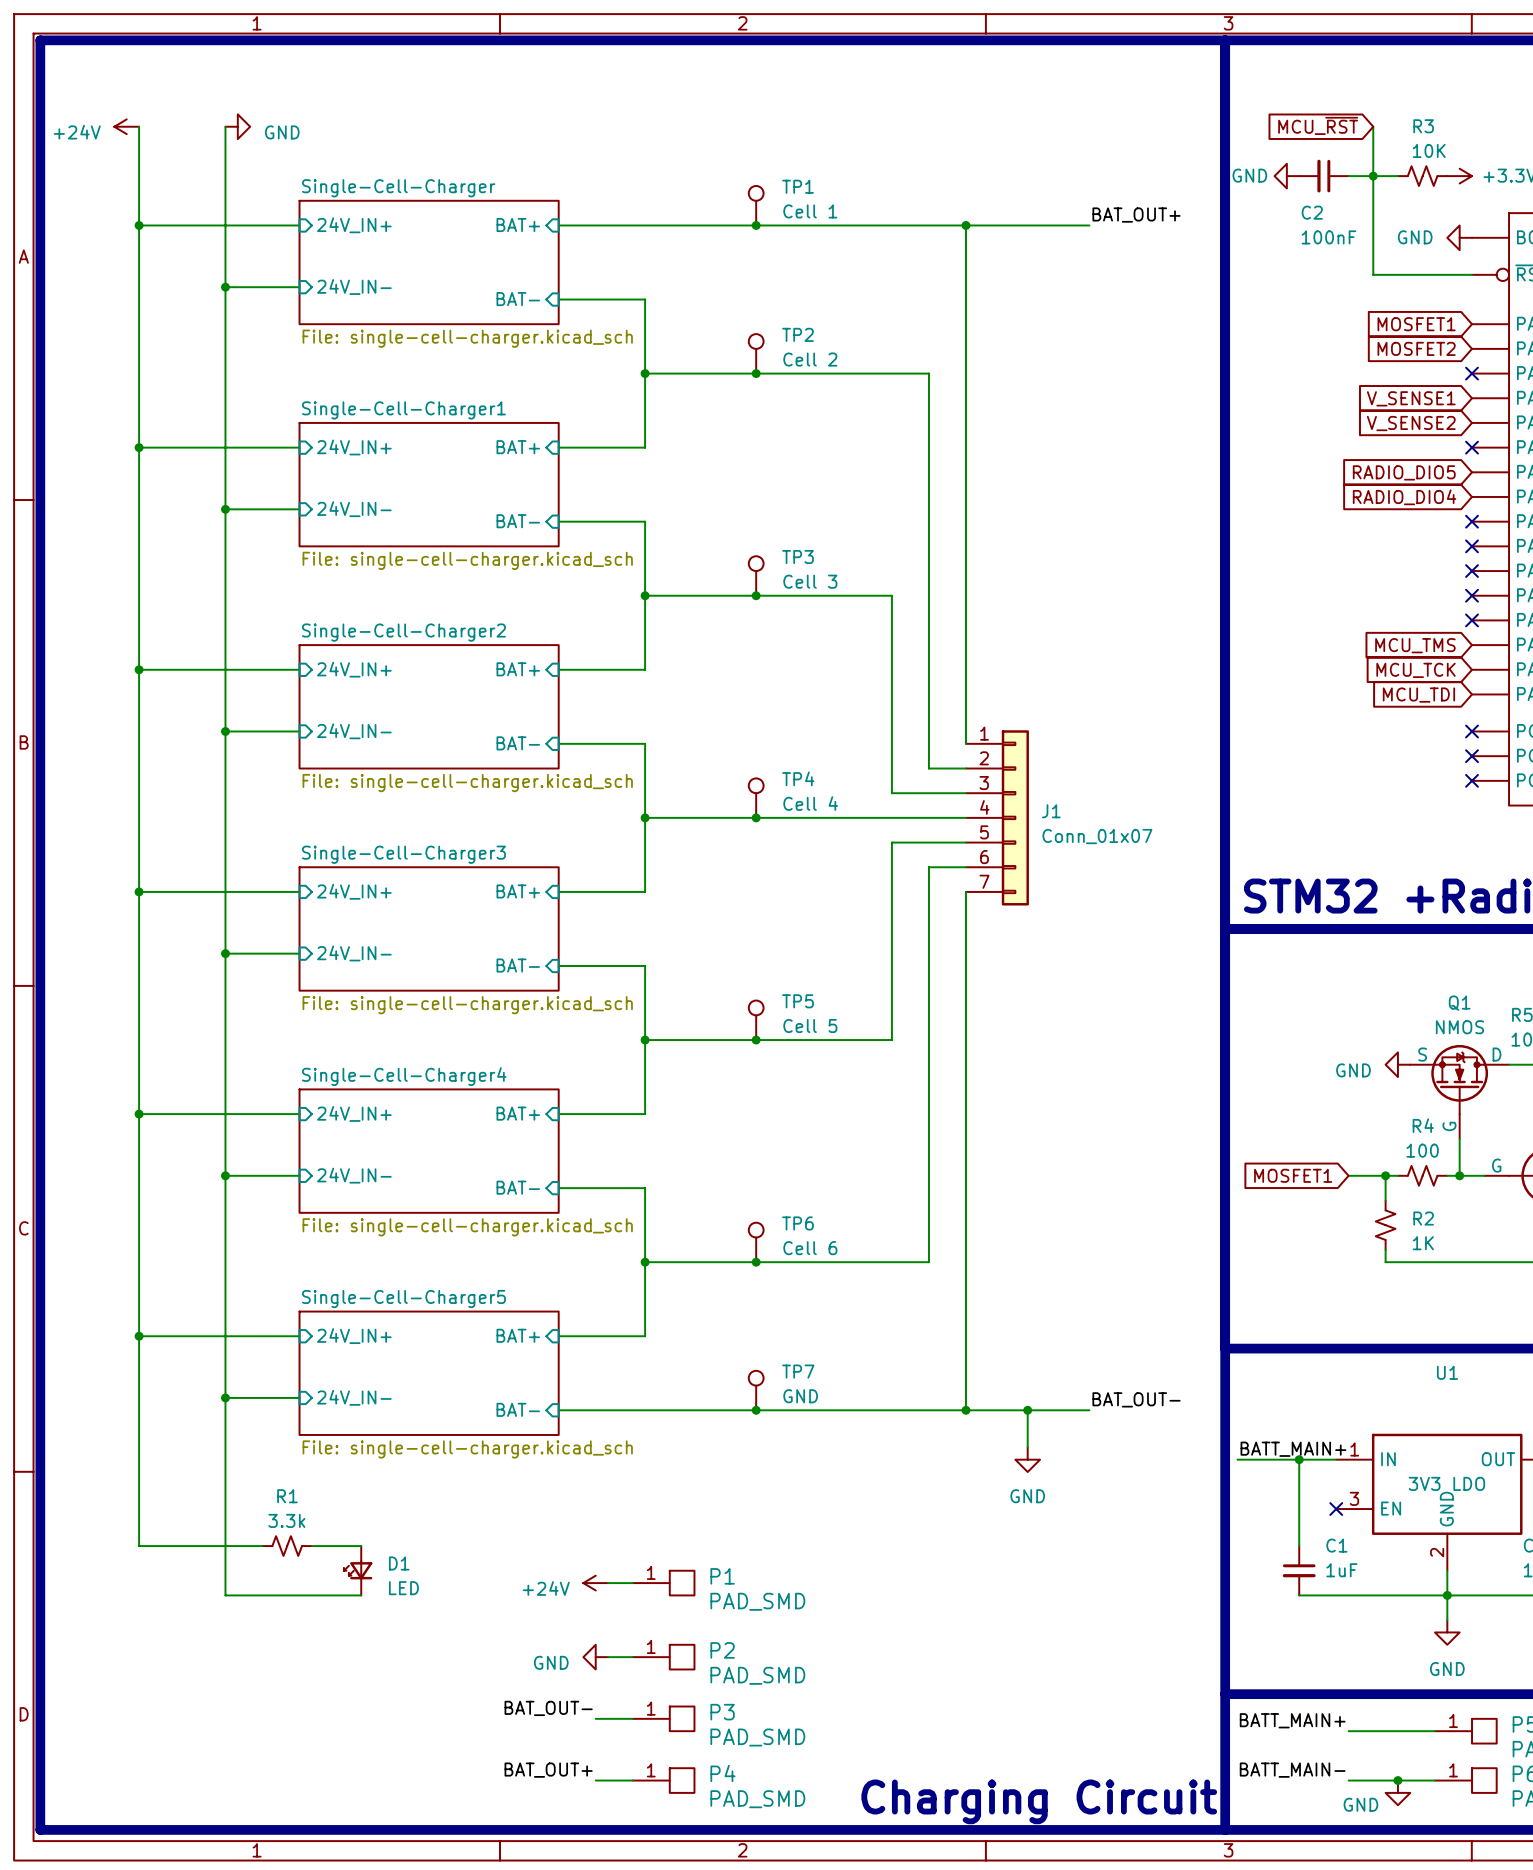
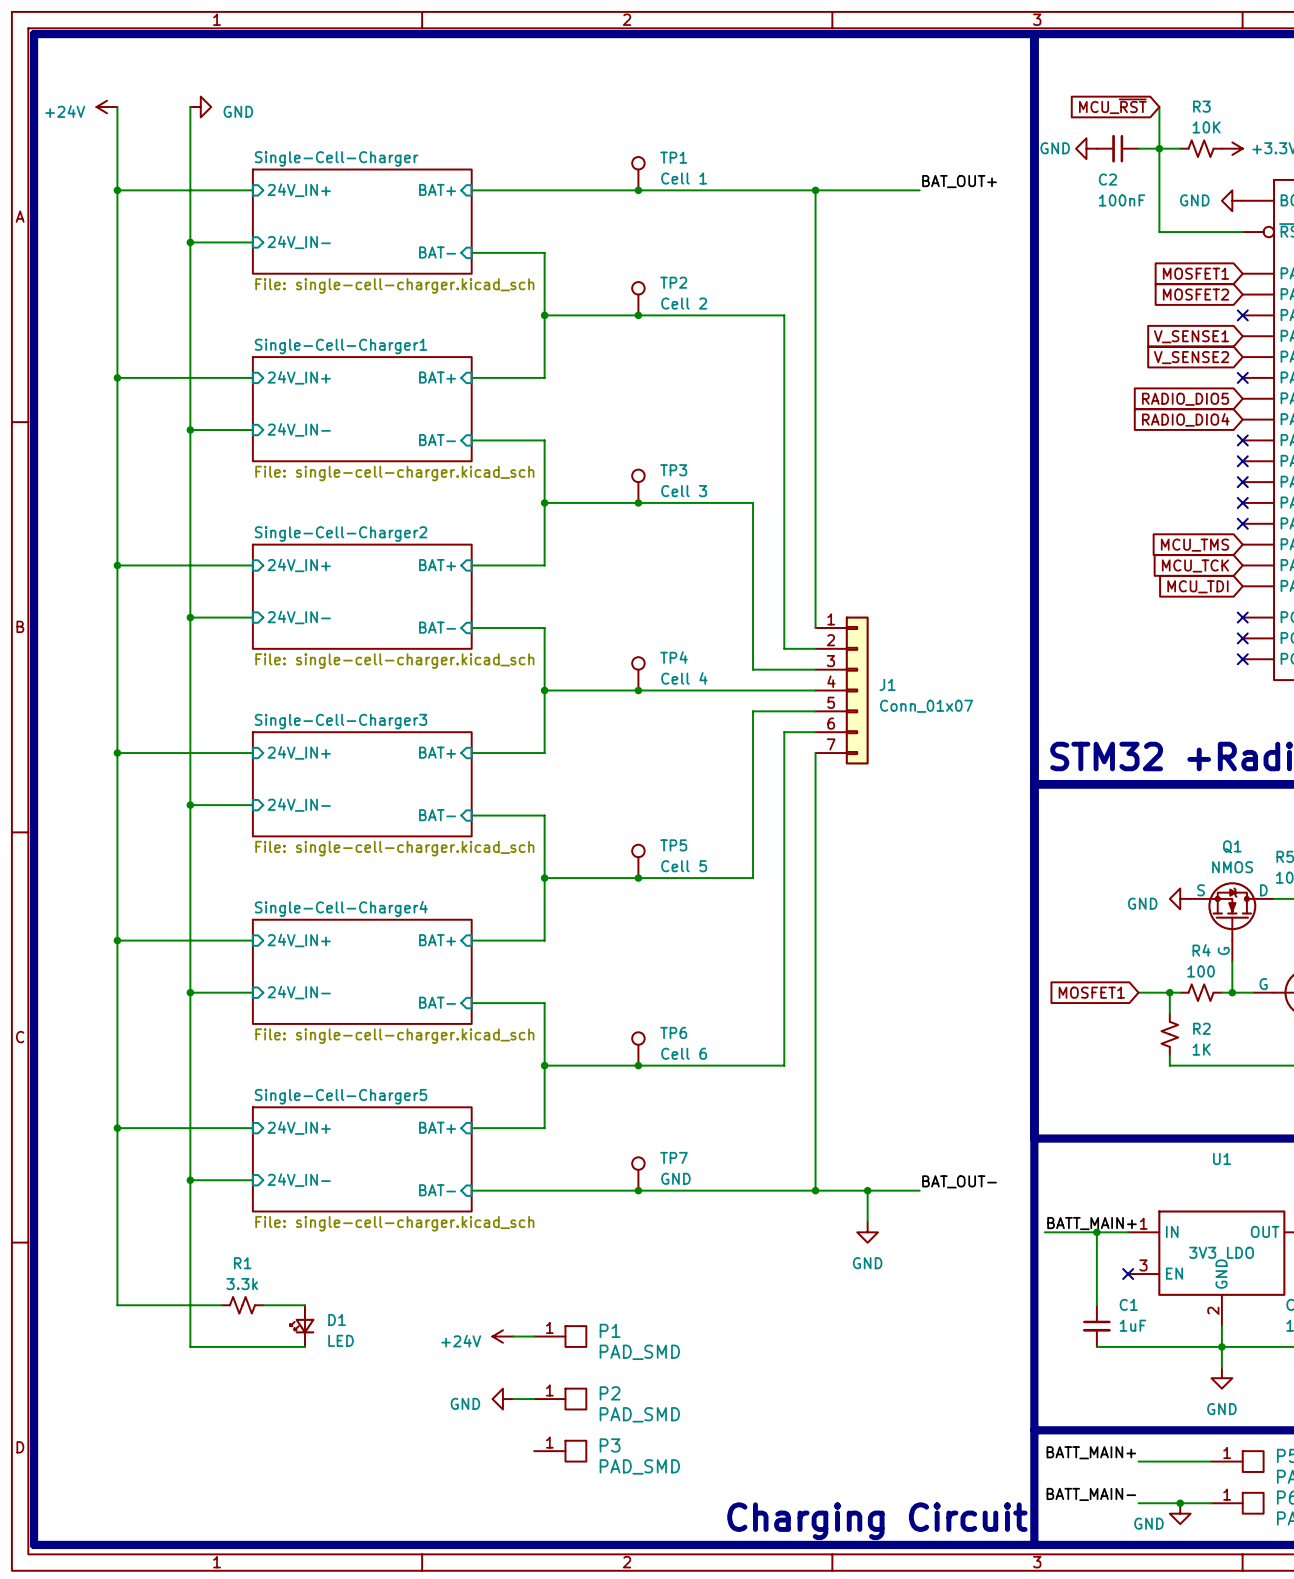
label: BAT_OUT- (548, 1708) -> none
wire: (595, 1718) (632, 1718) -> none
label: BAT_OUT+ (548, 1770) -> none
wire: (595, 1780) (632, 1780) -> none
P4: PAD_SMD (663, 1780) -> none

